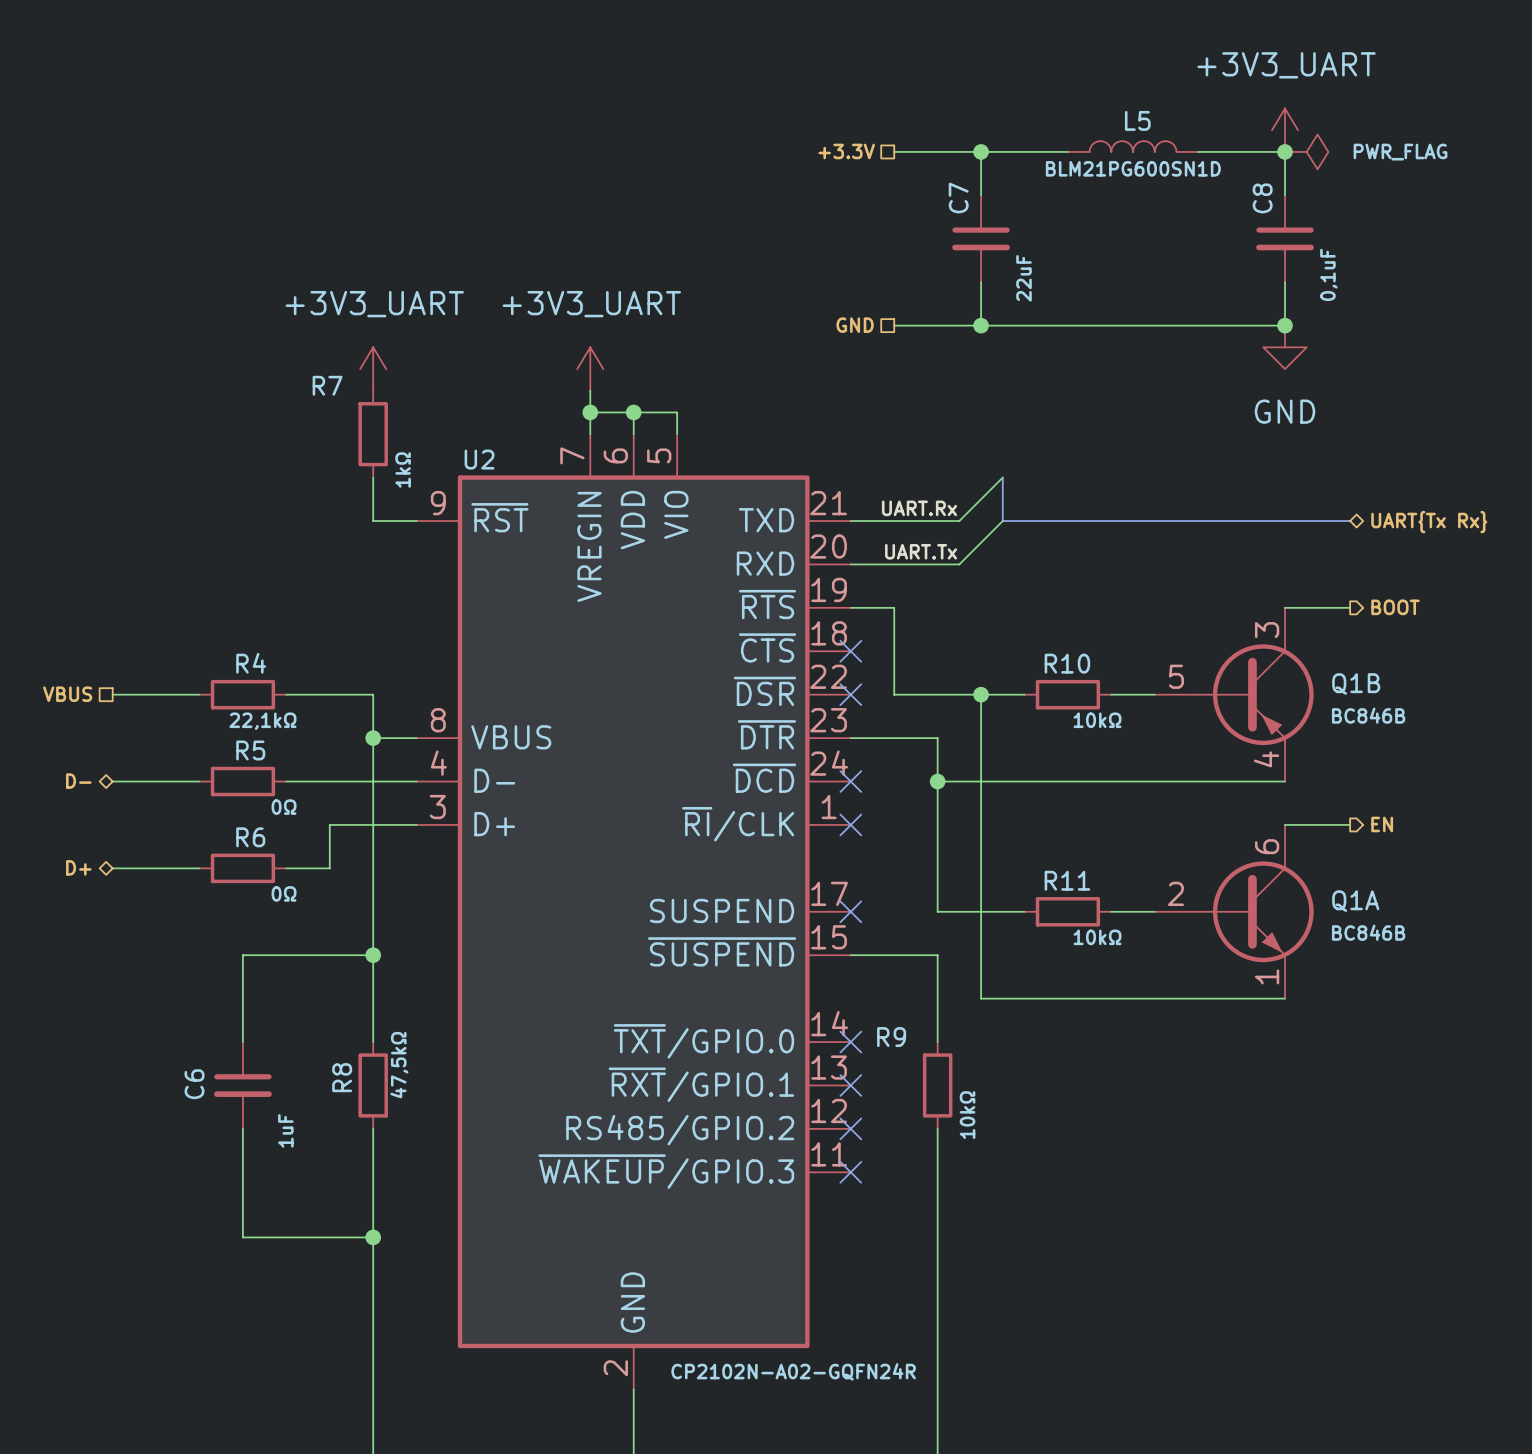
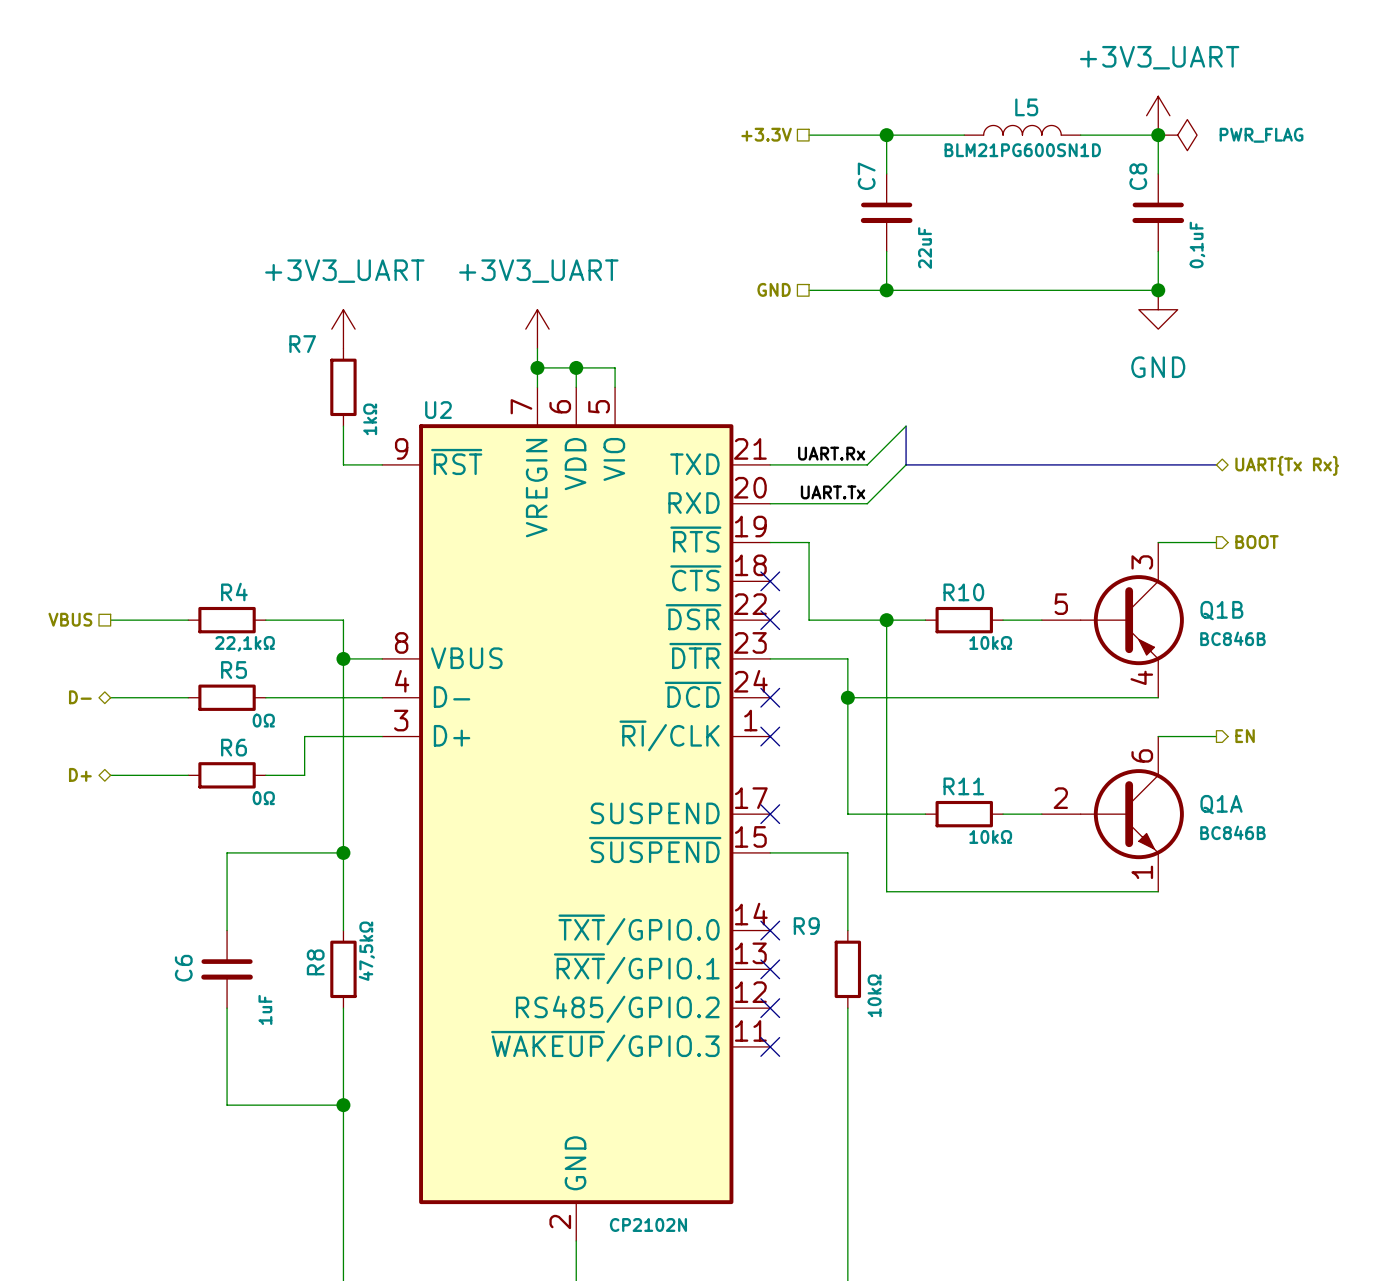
U2 value: CP2102N-A02-GQFN24R (793, 1371) -> CP2102N (648, 1224)

